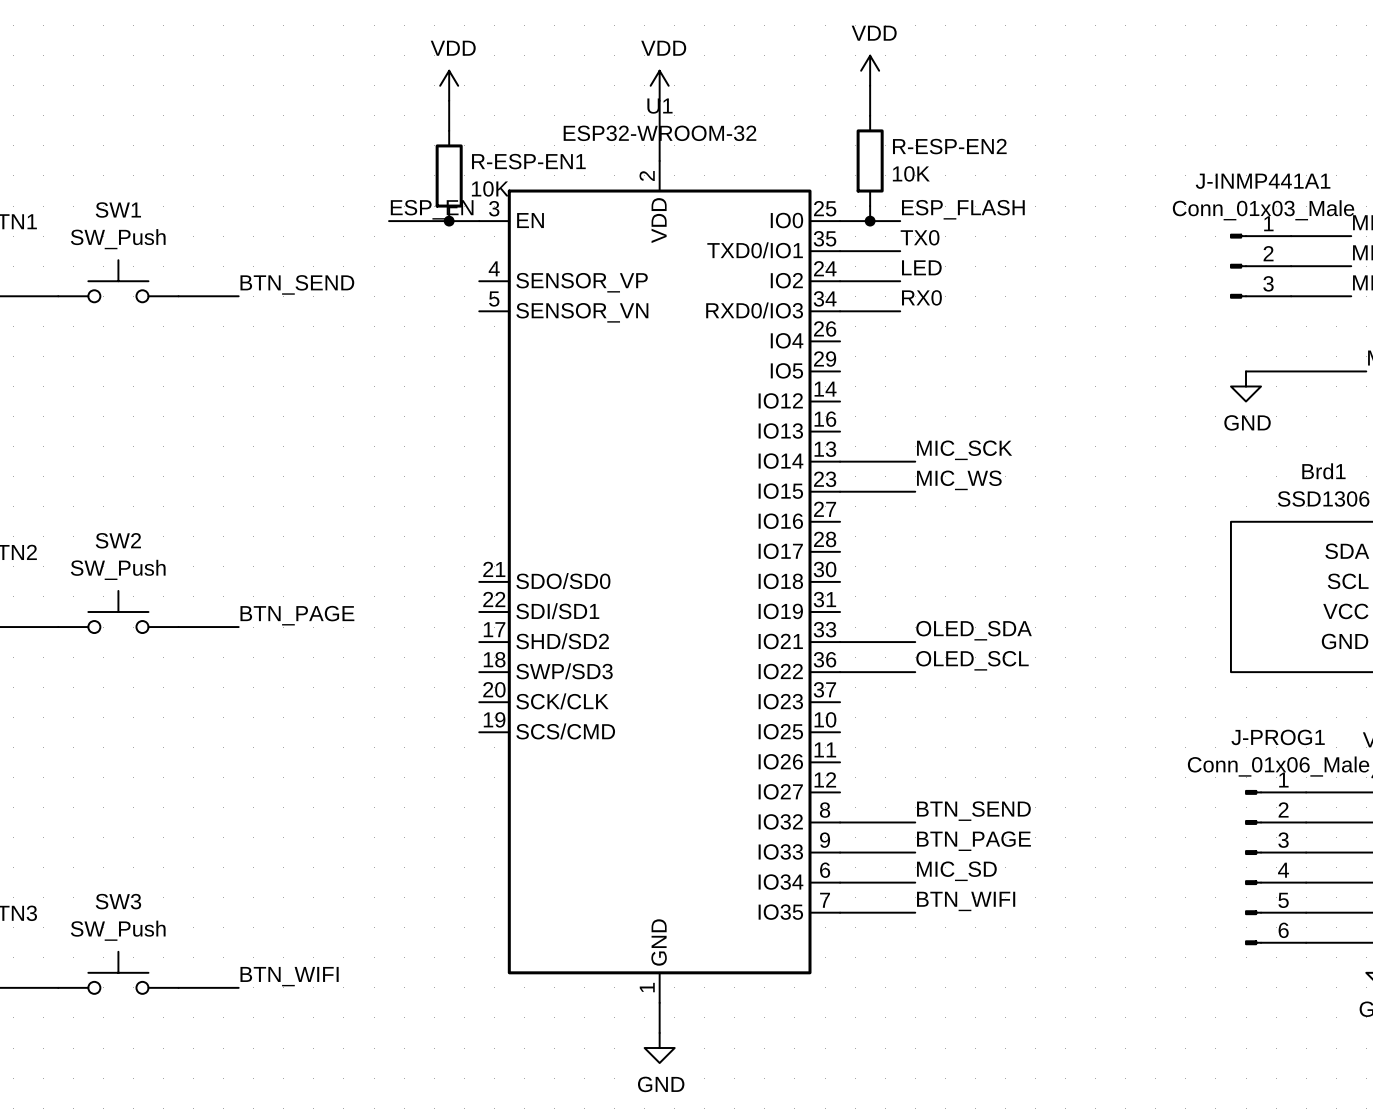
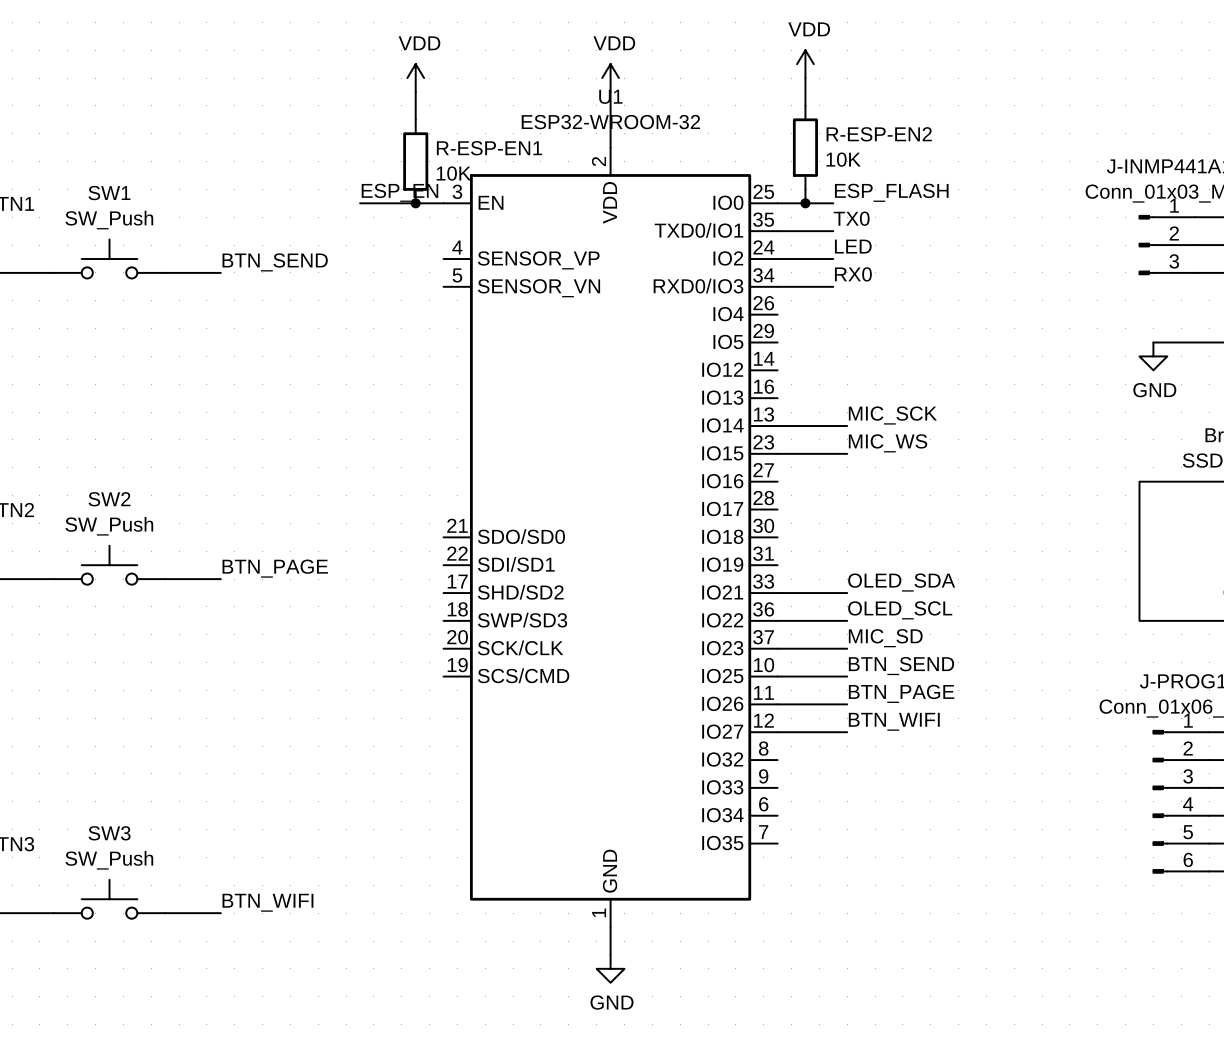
label position: BTN_SEND (973, 811) -> BTN_SEND (901, 666)
wire: (840, 822) (915, 822) -> (777, 648) (847, 648)
label position: BTN_PAGE (973, 841) -> BTN_PAGE (901, 693)
wire: (840, 852) (915, 852) -> (777, 676) (847, 676)
label position: MIC_SD (956, 871) -> MIC_SD (885, 638)
wire: (840, 882) (915, 882) -> (777, 704) (847, 704)
label position: BTN_WIFI (966, 901) -> BTN_WIFI (894, 721)
wire: (840, 912) (915, 912) -> (777, 732) (847, 732)

